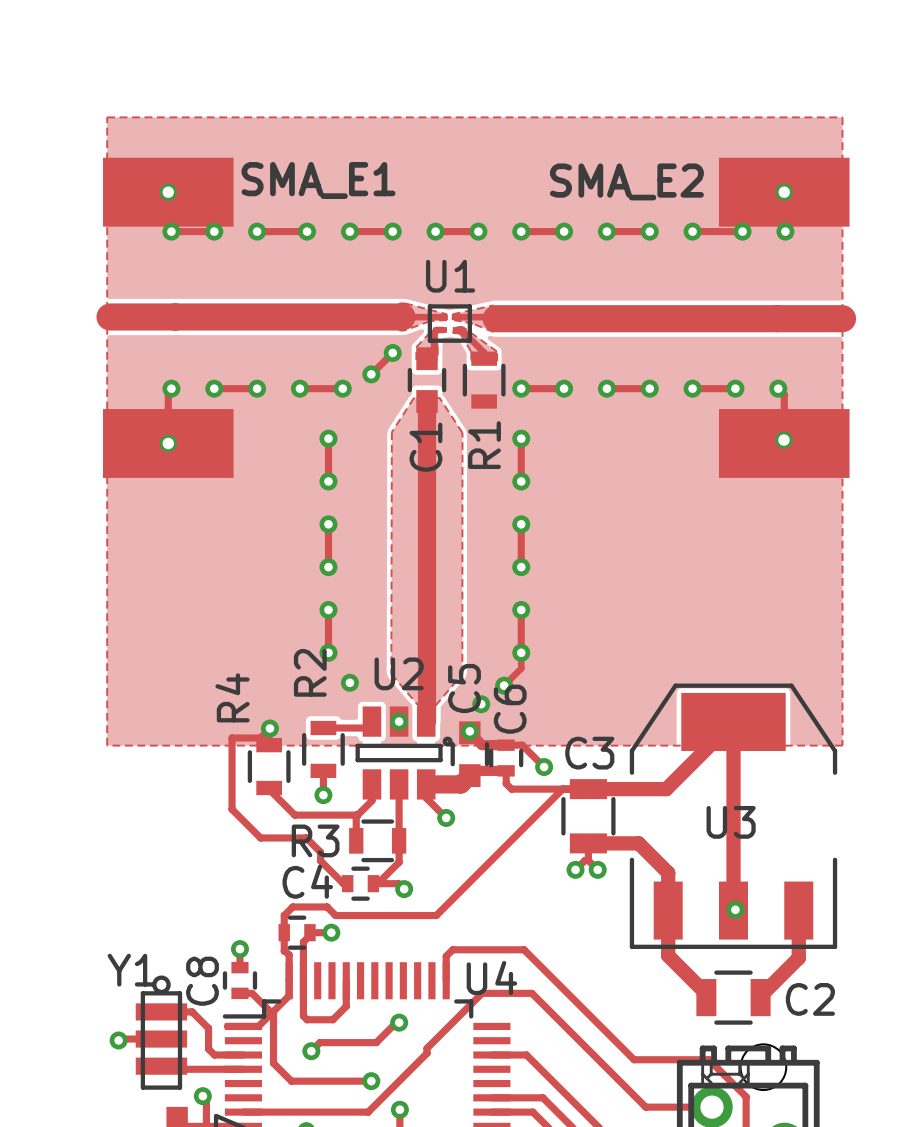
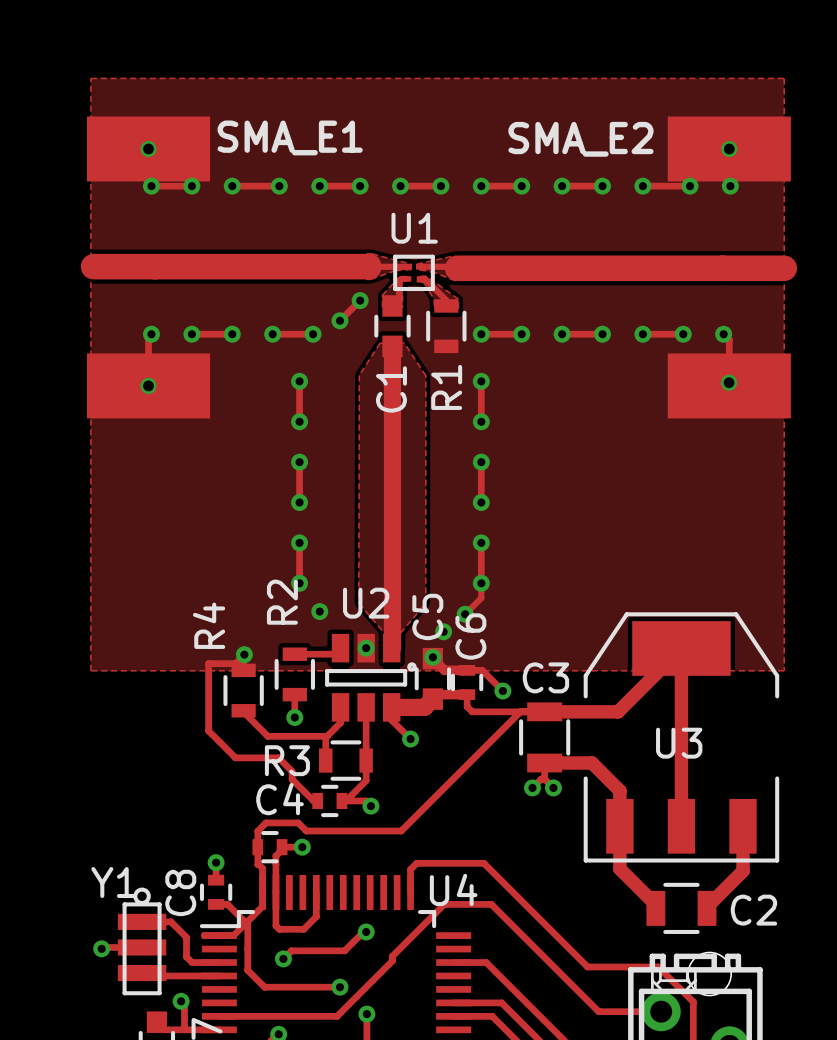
via: (735, 909) -> none

